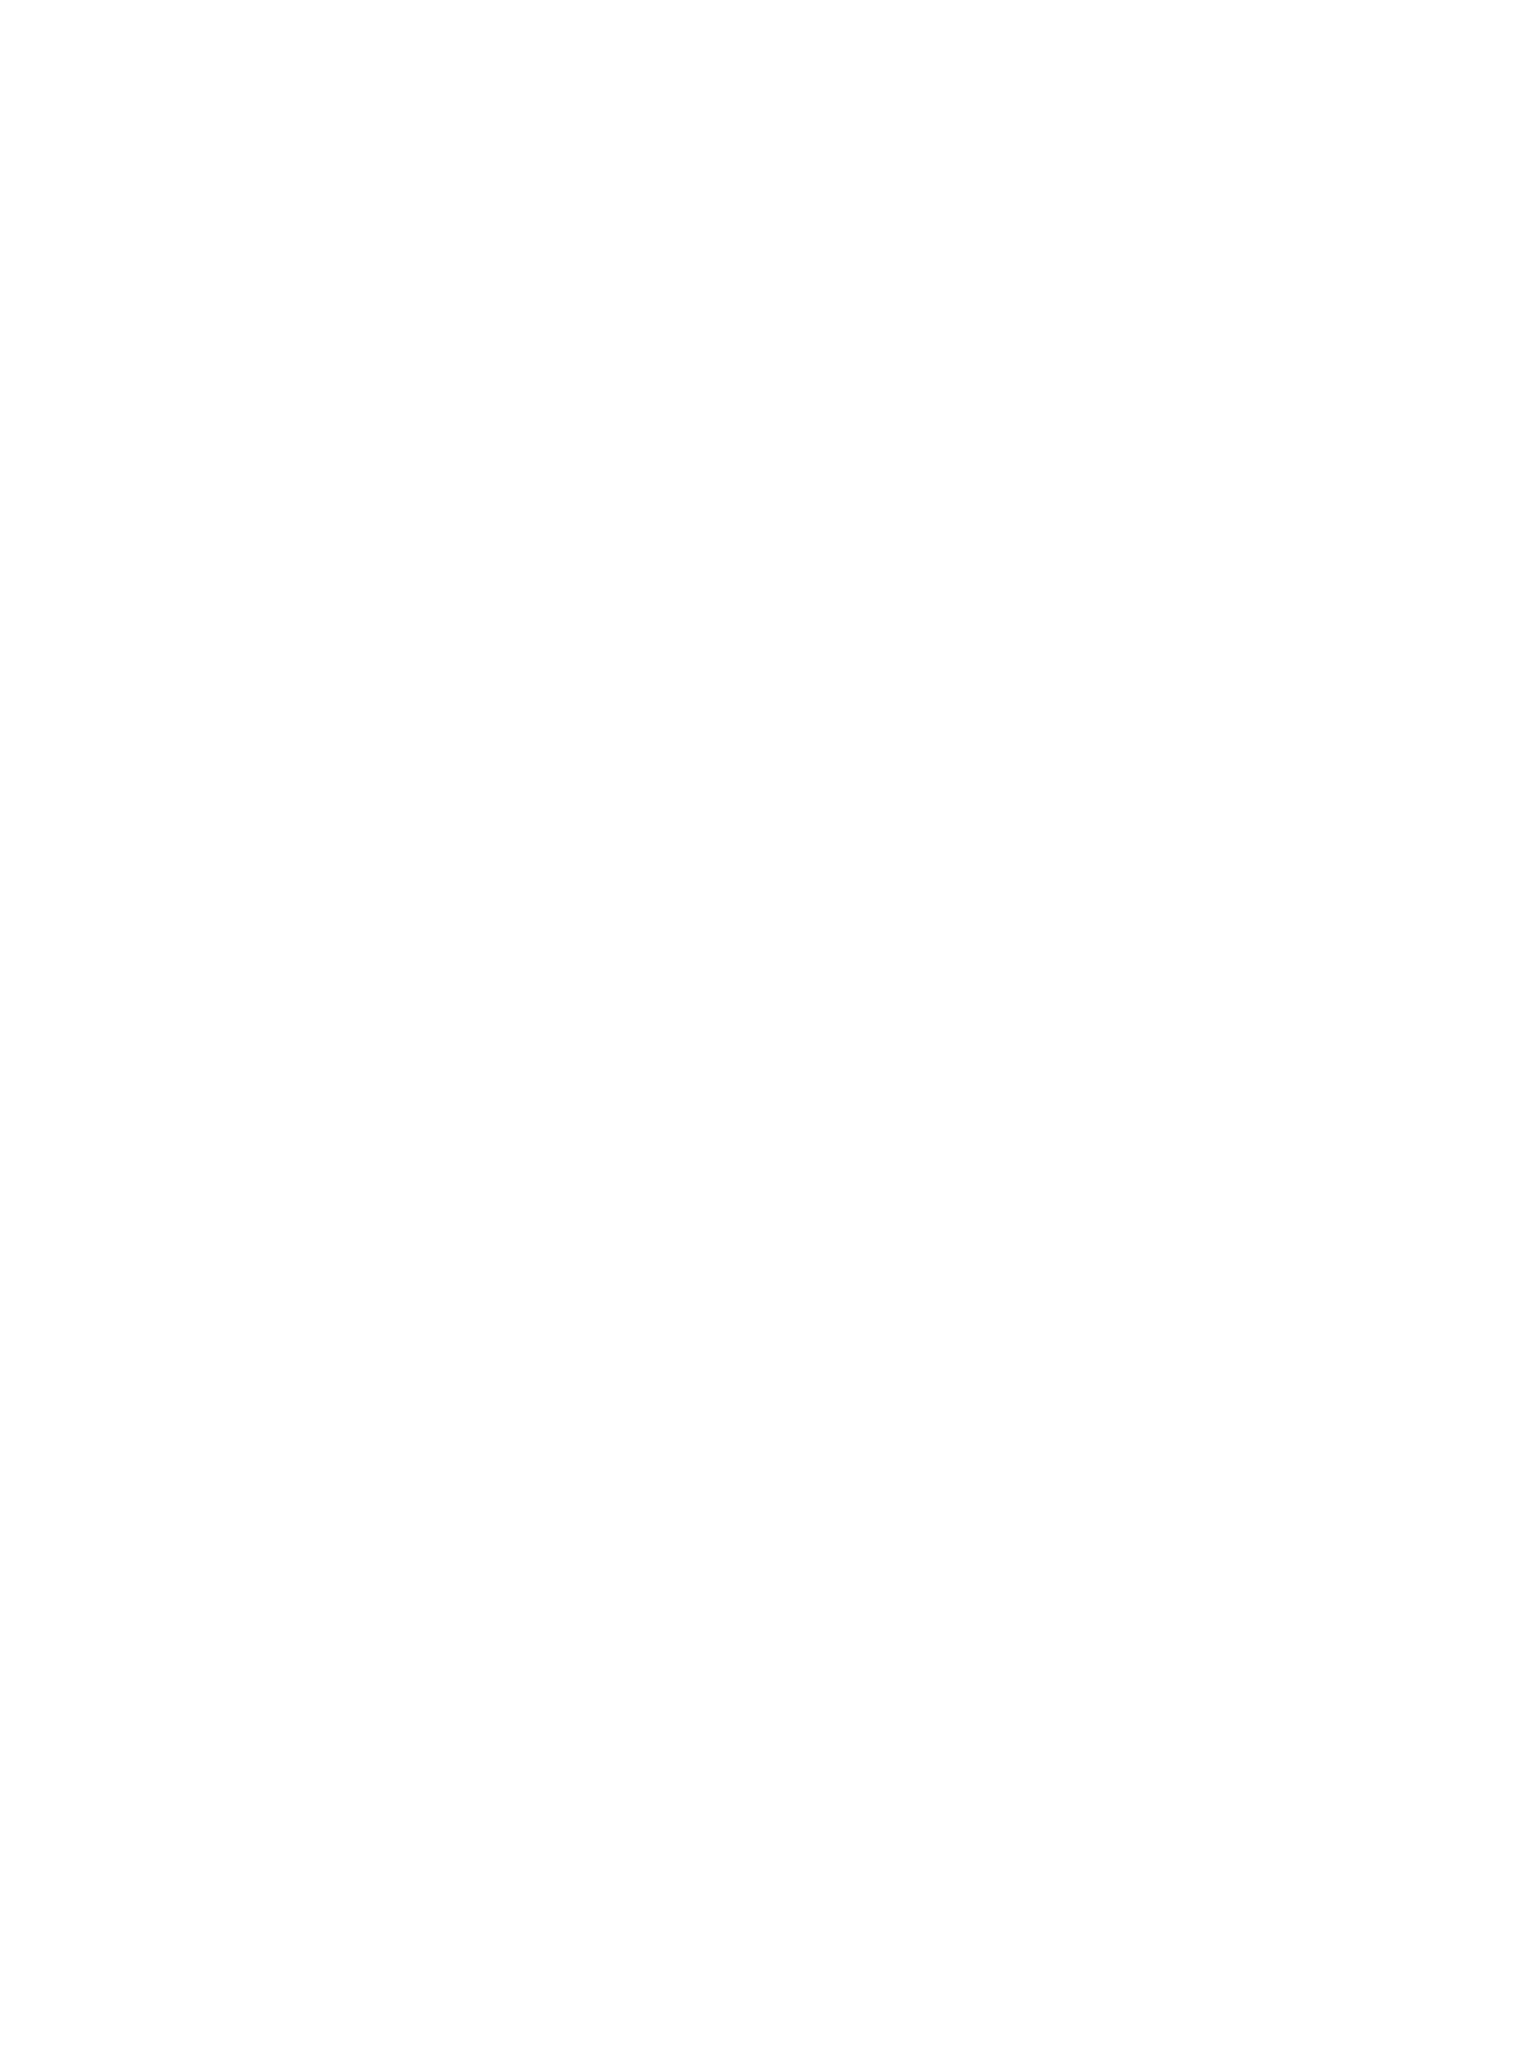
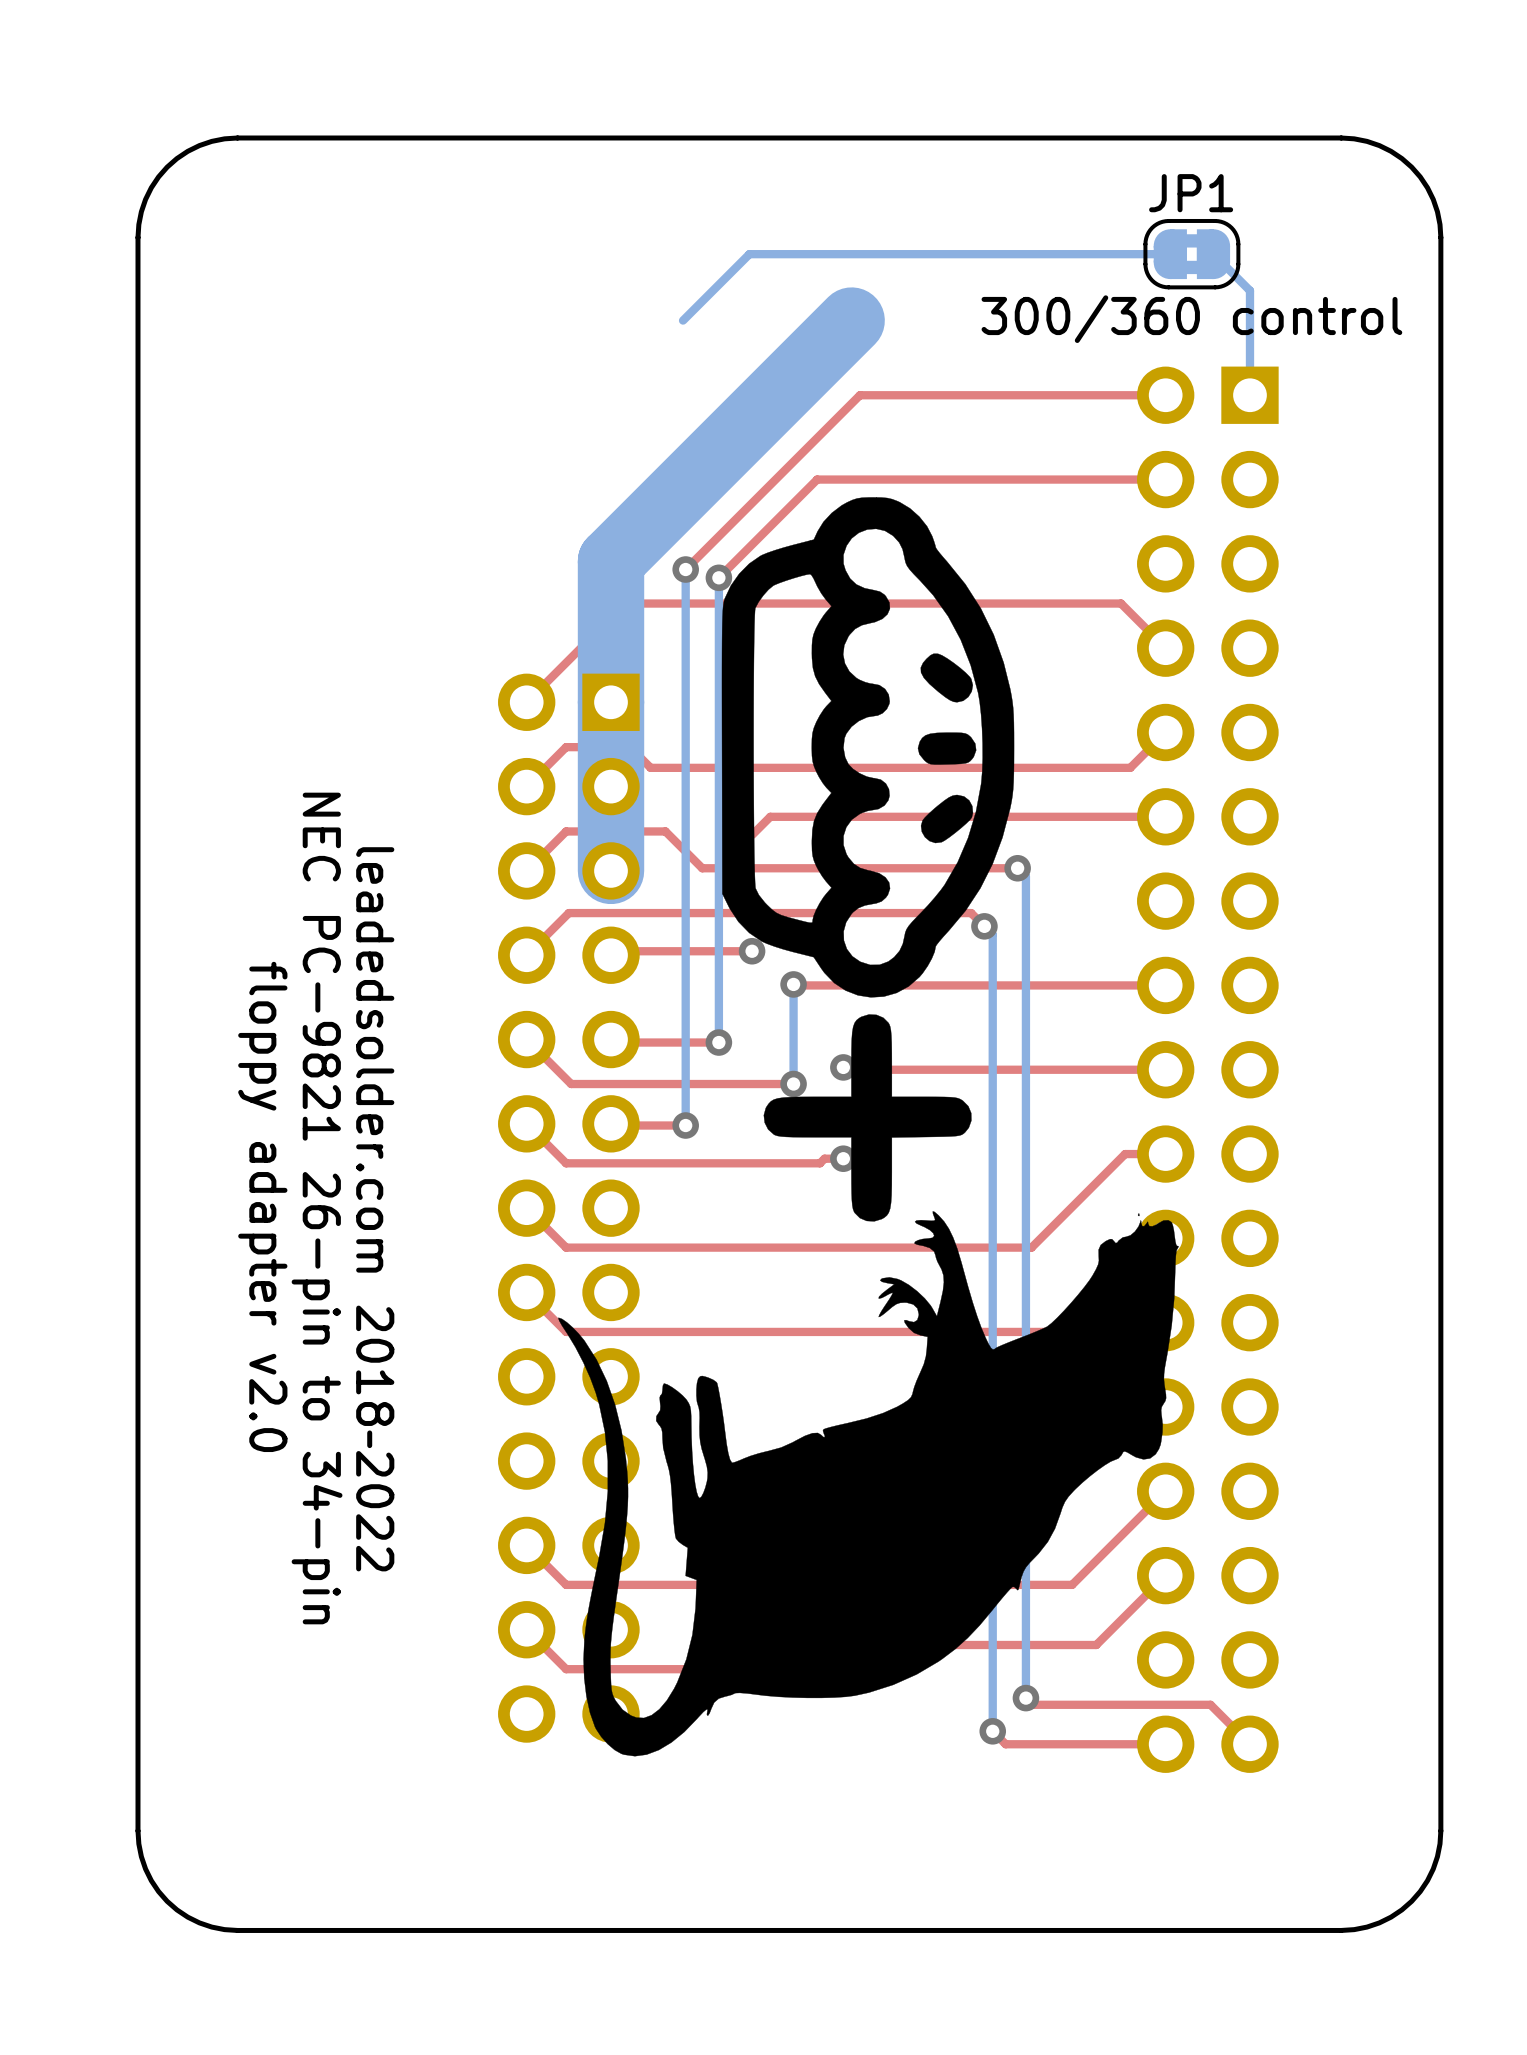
board edge: none -> (1341, 137) (237, 137) (211, 141) (187, 151) (167, 167) (151, 187) (141, 211) (137, 237) (137, 1830) (141, 1856) (151, 1880) (167, 1901) (187, 1917) (211, 1927) (237, 1930) (1341, 1930) (1367, 1927) (1391, 1917) (1411, 1901) (1427, 1880) (1437, 1856) (1440, 1830) (1440, 237) (1440, 224) (1433, 199) (1427, 187) (1411, 167) (1391, 151) (1379, 145) (1354, 138) (1341, 137)
bottom track: none -> (1170, 254) (749, 254) (683, 320)
JP1: none -> 300/360 control (1191, 254)
bottom track: none -> (1213, 254) (1249, 290) (1249, 395)
bottom track: none -> (851, 320) (611, 561) (611, 870)
top track: none -> (1165, 395) (859, 395) (685, 569)
top track: none -> (1165, 479) (817, 479) (718, 577)
drawing: none -> [558, 497, 1179, 1757]
bottom track: none -> (685, 569) (685, 1125)
via: none -> (685, 569)
bottom track: none -> (718, 577) (718, 1042)
via: none -> (718, 577)
top track: none -> (1165, 648) (1121, 603) (625, 603) (526, 702)
top track: none -> (1165, 732) (1130, 767) (650, 767) (629, 747) (566, 747) (526, 786)
top track: none -> (1165, 816) (770, 816) (752, 835)
bottom track: none -> (1017, 868) (1025, 876) (1025, 1698)
top track: none -> (1017, 868) (702, 868) (665, 831) (566, 831) (526, 870)
via: none -> (1017, 868)
bottom track: none -> (984, 926) (992, 934) (992, 1731)
top track: none -> (984, 926) (971, 913) (568, 913) (526, 955)
via: none -> (984, 926)
top track: none -> (752, 951) (614, 951) (611, 955)
via: none -> (752, 951)
bottom track: none -> (793, 984) (793, 1084)
top track: none -> (793, 984) (1165, 985)
via: none -> (793, 984)
top track: none -> (526, 1039) (571, 1084) (793, 1084)
top track: none -> (611, 1039) (613, 1042) (718, 1042)
via: none -> (718, 1042)
top track: none -> (843, 1067) (845, 1069) (1165, 1069)
via: none -> (843, 1067)
part: none -> (1207, 1069)
via: none -> (793, 1084)
top track: none -> (526, 1123) (566, 1163) (819, 1163) (824, 1158) (843, 1158)
top track: none -> (611, 1123) (612, 1125) (685, 1125)
via: none -> (685, 1125)
top track: none -> (1165, 1154) (1125, 1154) (1031, 1247) (566, 1247) (526, 1208)
via: none -> (843, 1158)
text: none -> floppy adapter v2.0 (262, 1206)
text: none -> NEC PC-9821 26-pin to 34-pin (317, 1208)
part: none -> (568, 1208)
text: none -> leadedsolder.com 2018–2022 (375, 1209)
top track: none -> (1165, 1238) (1072, 1331) (566, 1331) (526, 1292)
top track: none -> (1165, 1491) (1072, 1584) (566, 1584) (526, 1545)
top track: none -> (1165, 1575) (1096, 1645) (717, 1645) (693, 1669) (566, 1669) (526, 1629)
top track: none -> (1025, 1698) (1032, 1704) (1210, 1704) (1249, 1744)
via: none -> (1025, 1698)
top track: none -> (992, 1731) (1005, 1744) (1165, 1744)
via: none -> (992, 1731)

